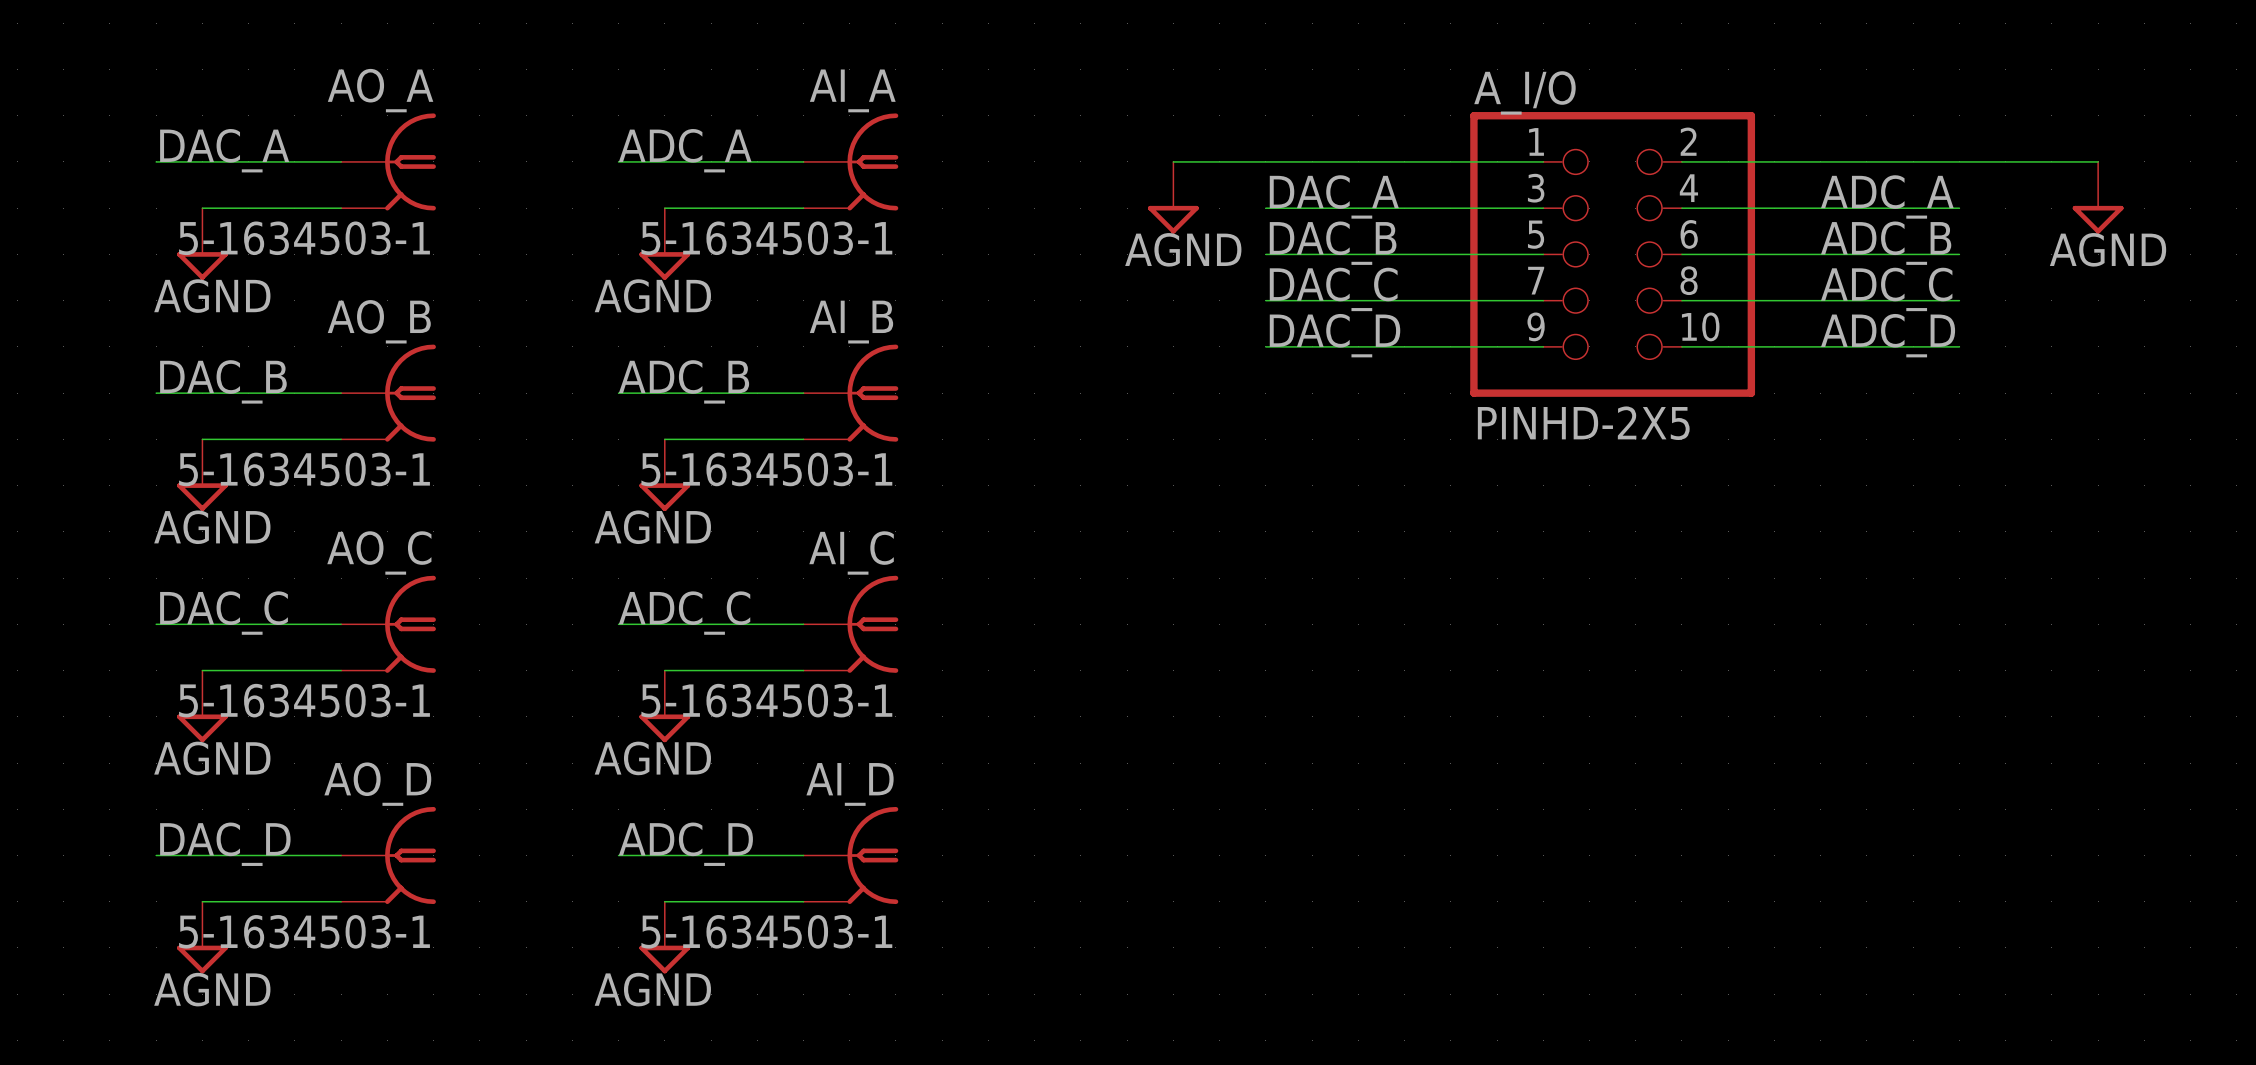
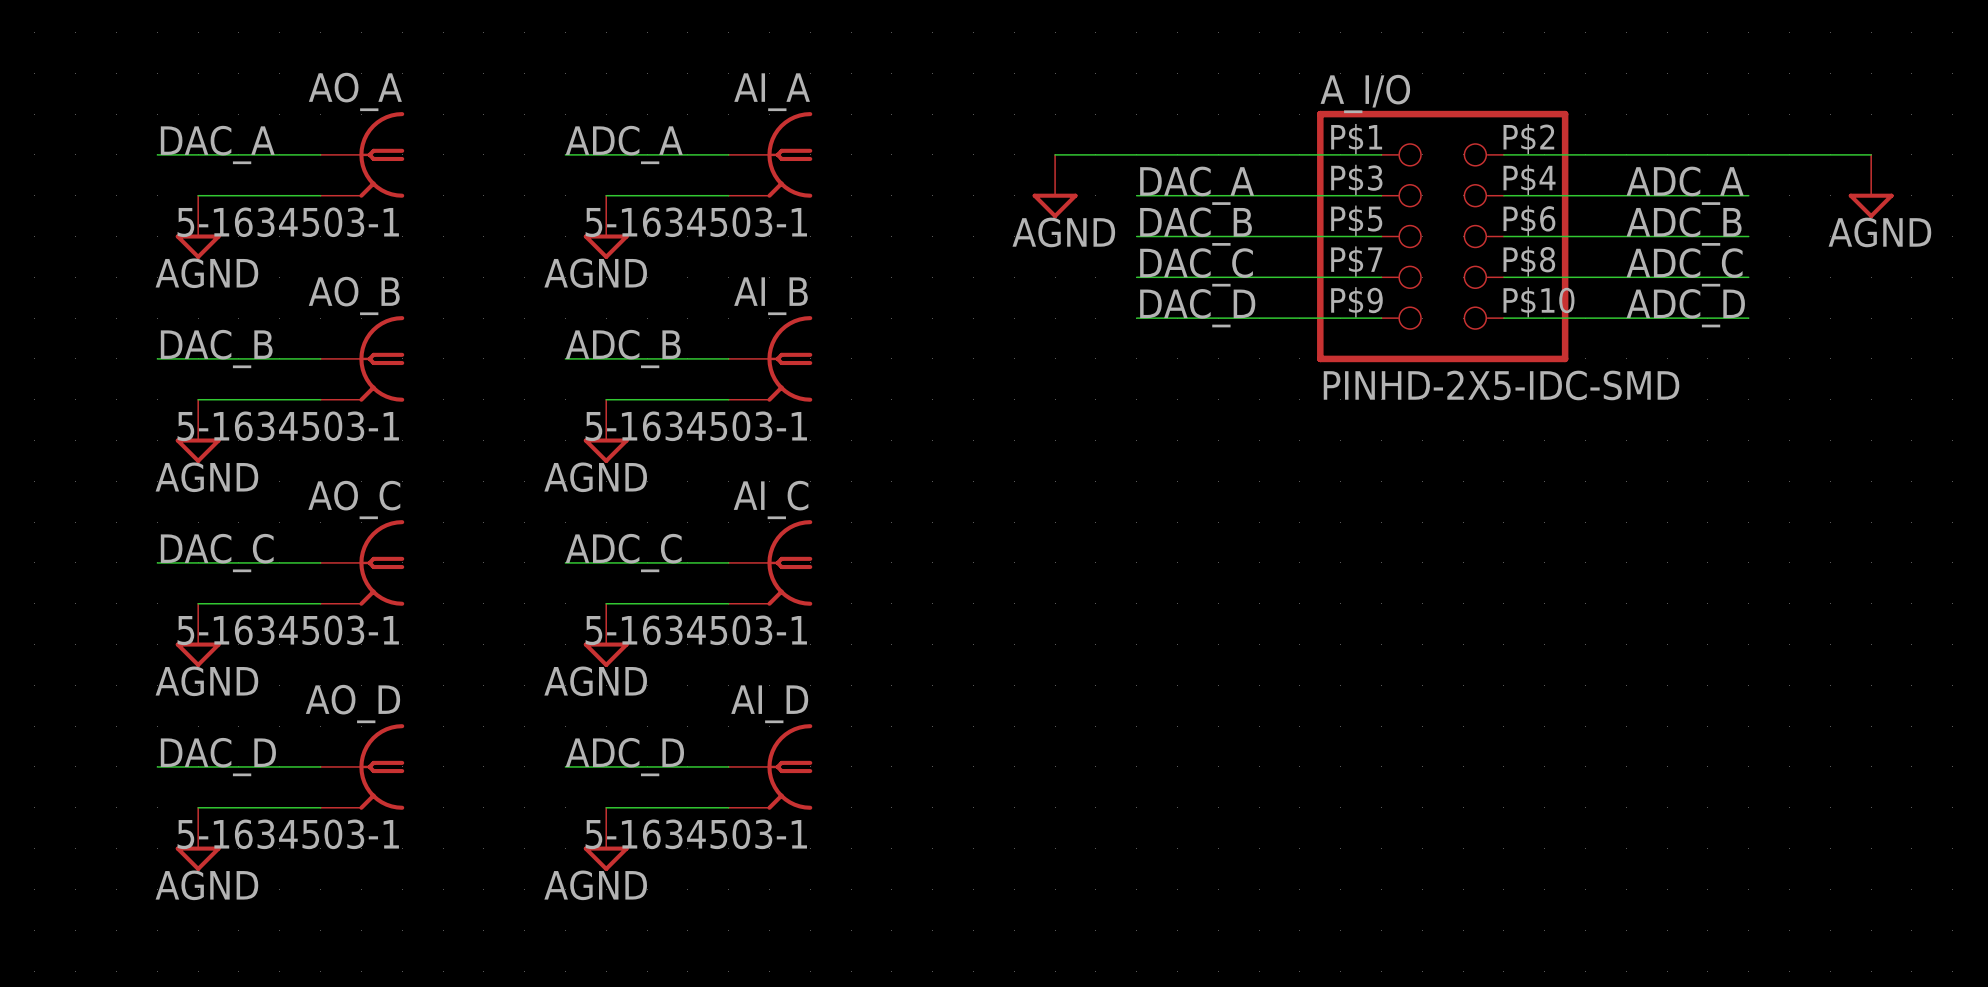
A_I/O symbol: [1470, 112, 1756, 397] -> [1317, 110, 1569, 363]
A_I/O value: PINHD-2X5 (1583, 423) -> PINHD-2X5-IDC-SMD (1501, 385)

